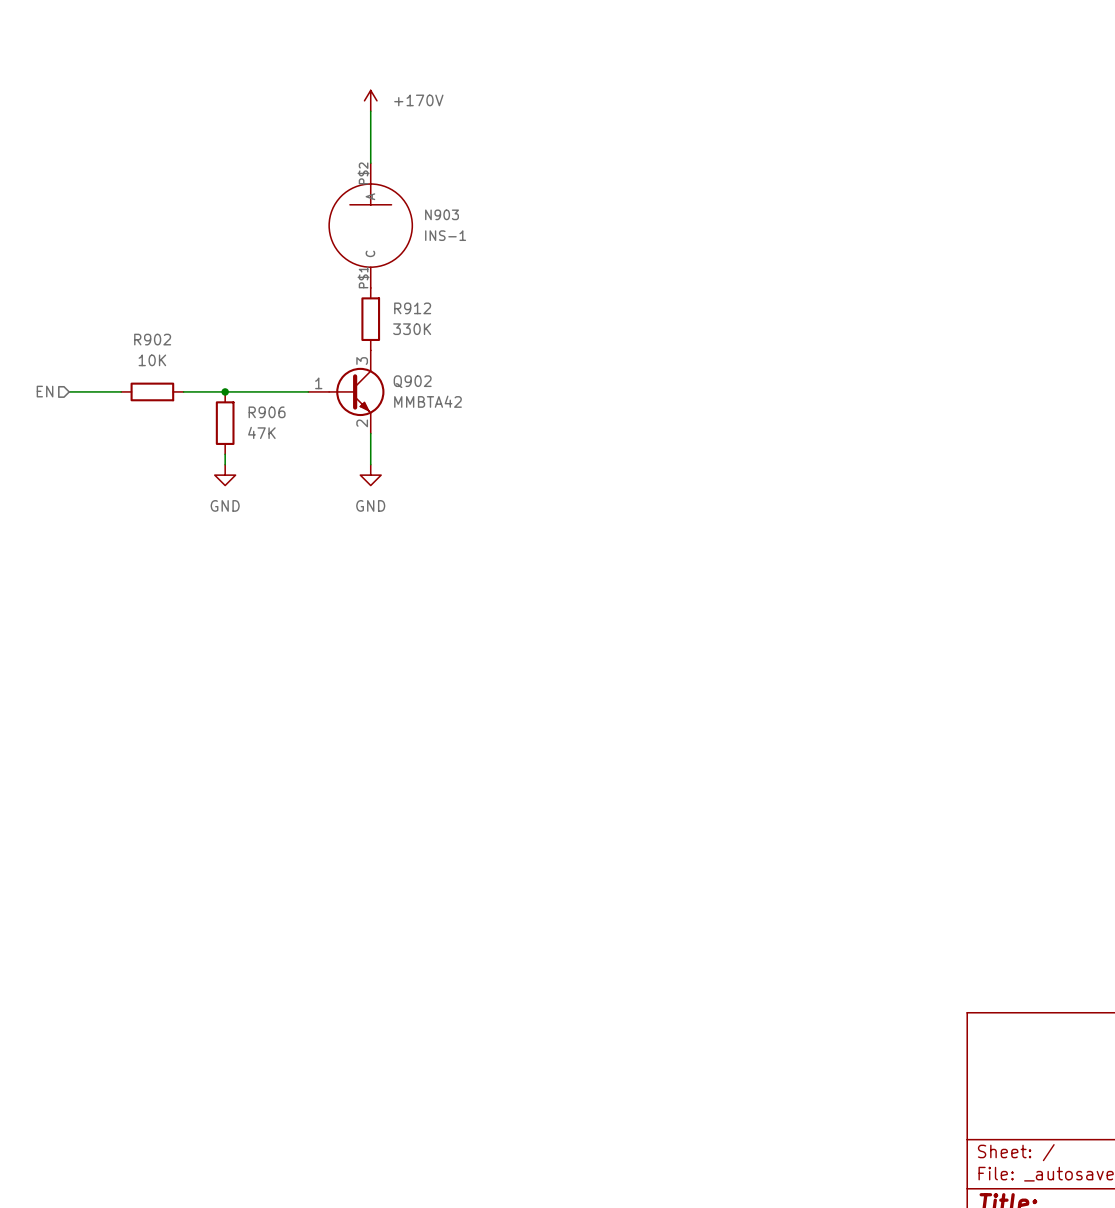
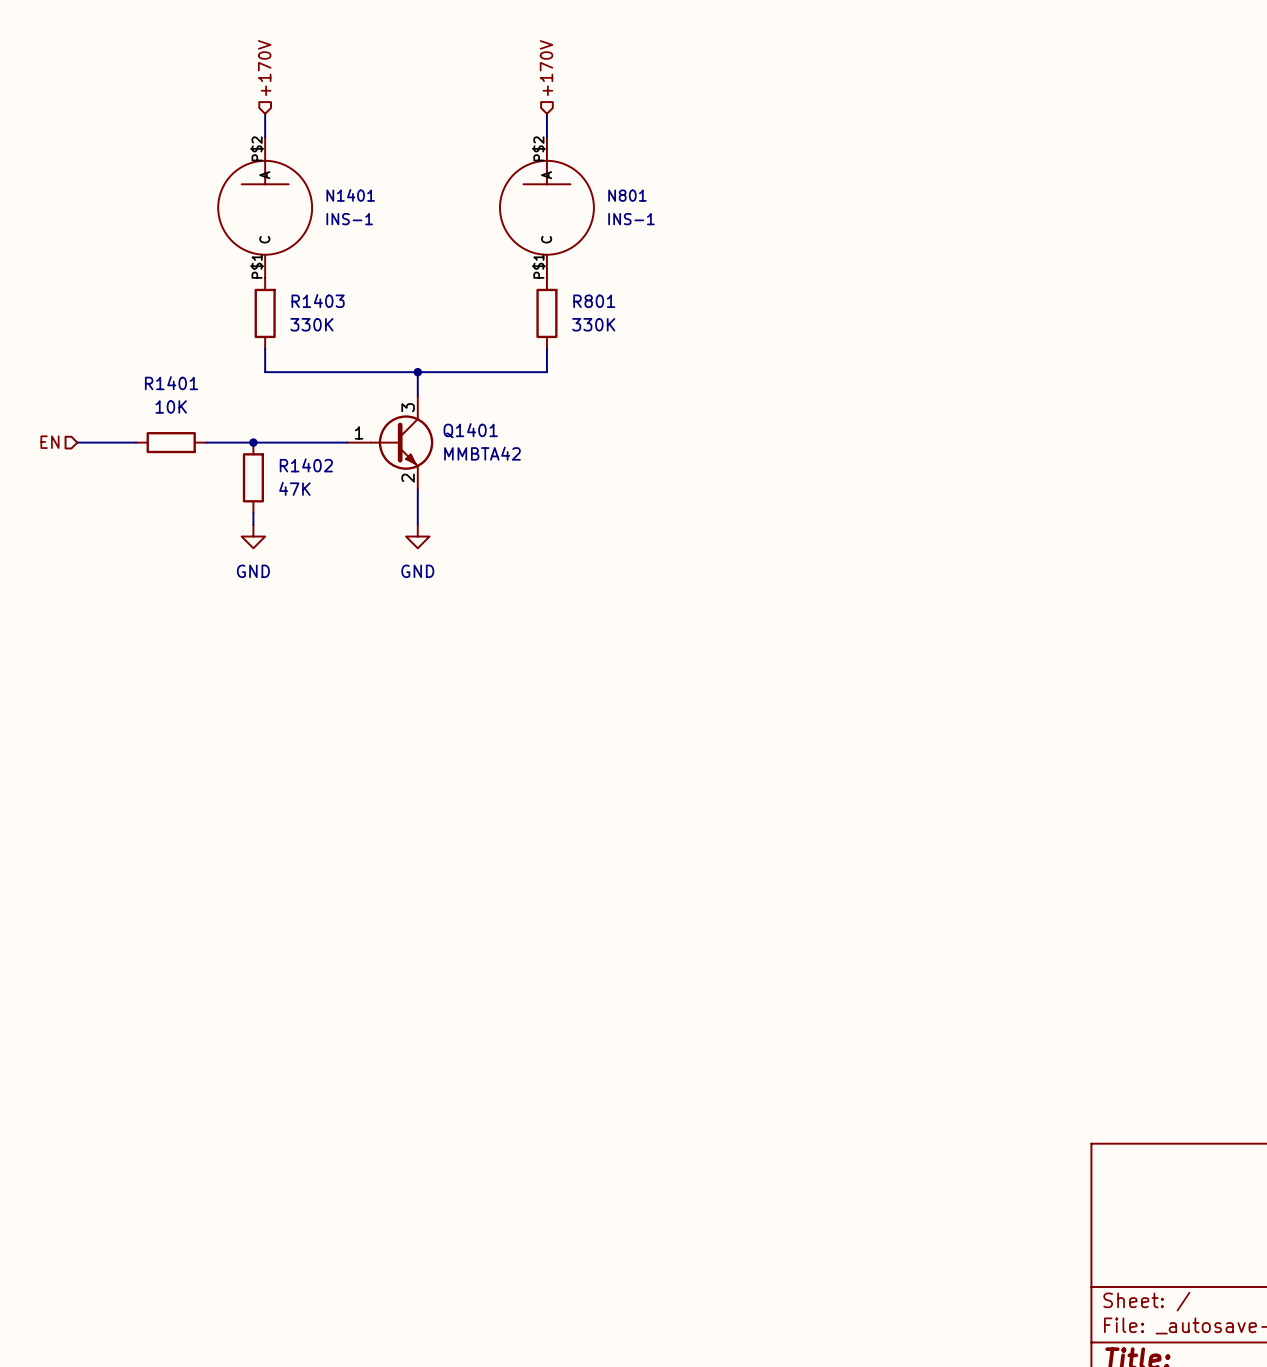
hierarchical label: none -> +170V (264, 68)
hierarchical label: none -> +170V (546, 68)
wire: none -> (265, 113) (265, 137)
power symbol: +170V (370, 100) -> none
wire: none -> (546, 113) (546, 137)
wire: (370, 111) (370, 163) -> none
N1401: none -> INS-1 (265, 207)
N801: none -> INS-1 (546, 207)
N903: INS-1 (370, 225) -> none
R1403: none -> 330K (265, 313)
R801: none -> 330K (546, 313)
wire: none -> (265, 348) (265, 372) (546, 372) (546, 348)
R912: 330K (370, 319) -> none
junction: none -> (417, 372)
R902 name: R902 (152, 339) -> R1401 (171, 383)
Q902 name: Q902 (412, 381) -> Q1401 (470, 430)
R906 name: R906 (267, 412) -> R1402 (306, 465)

